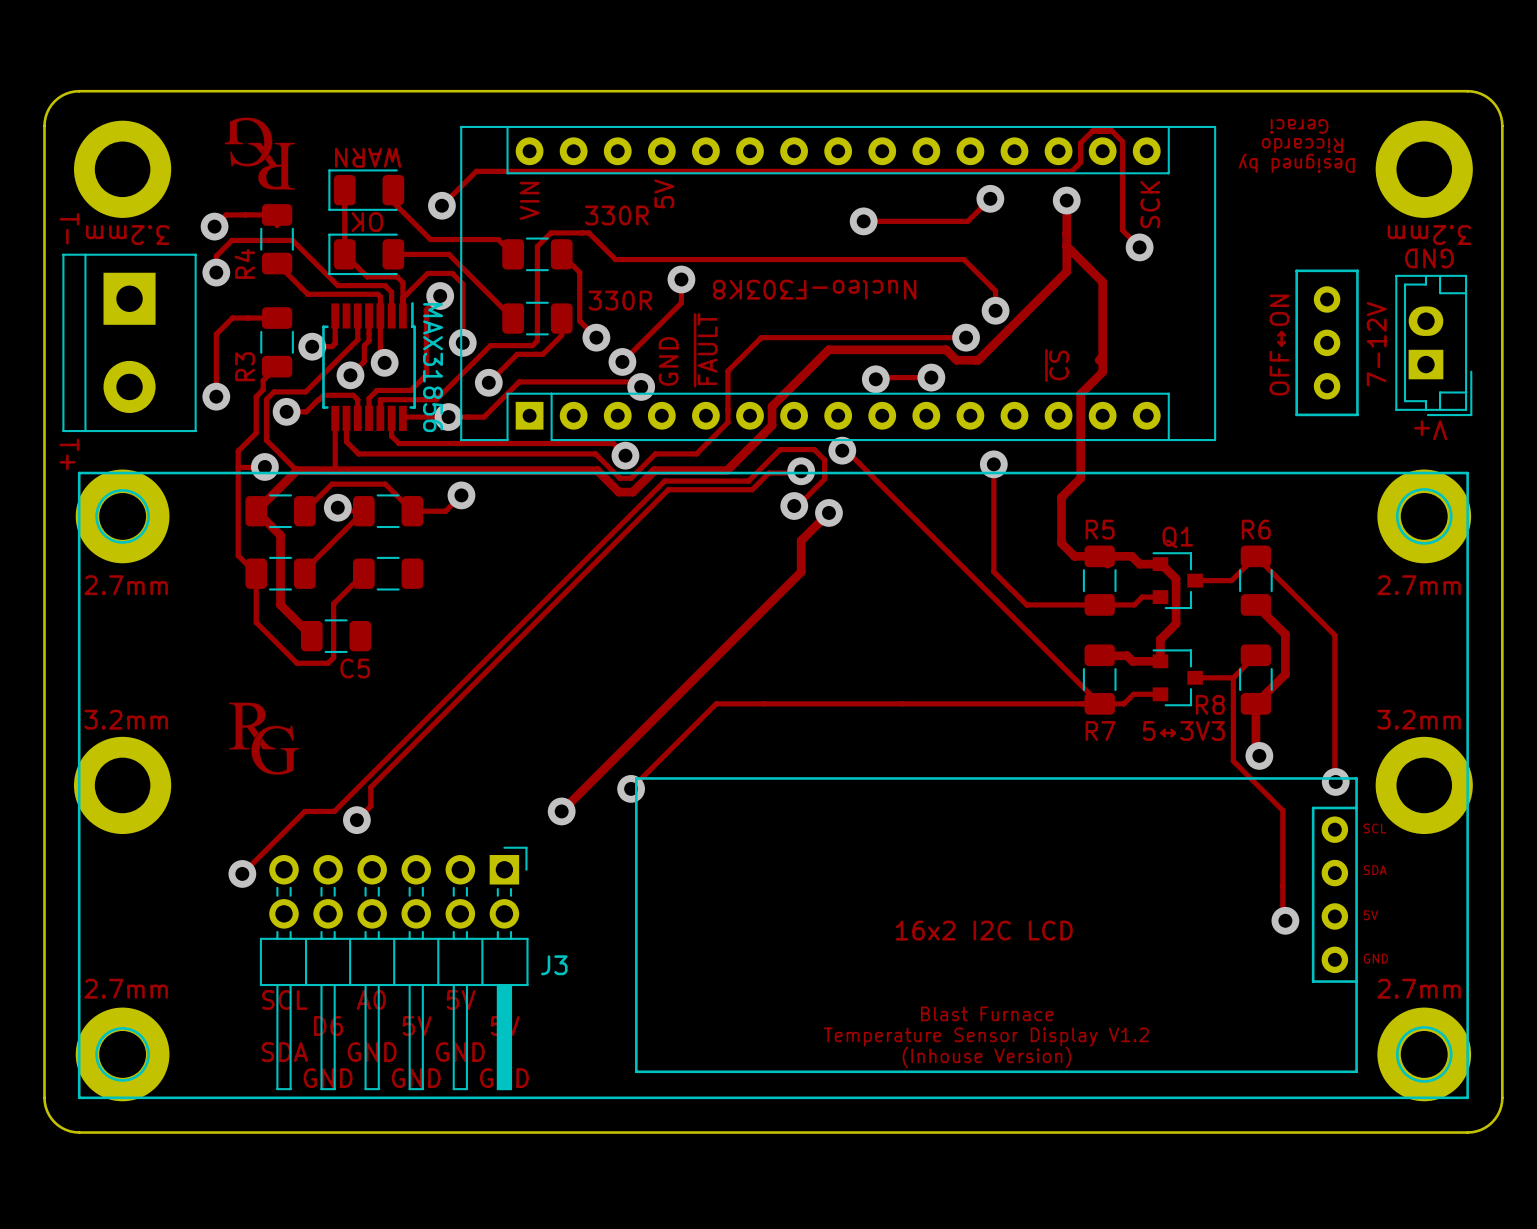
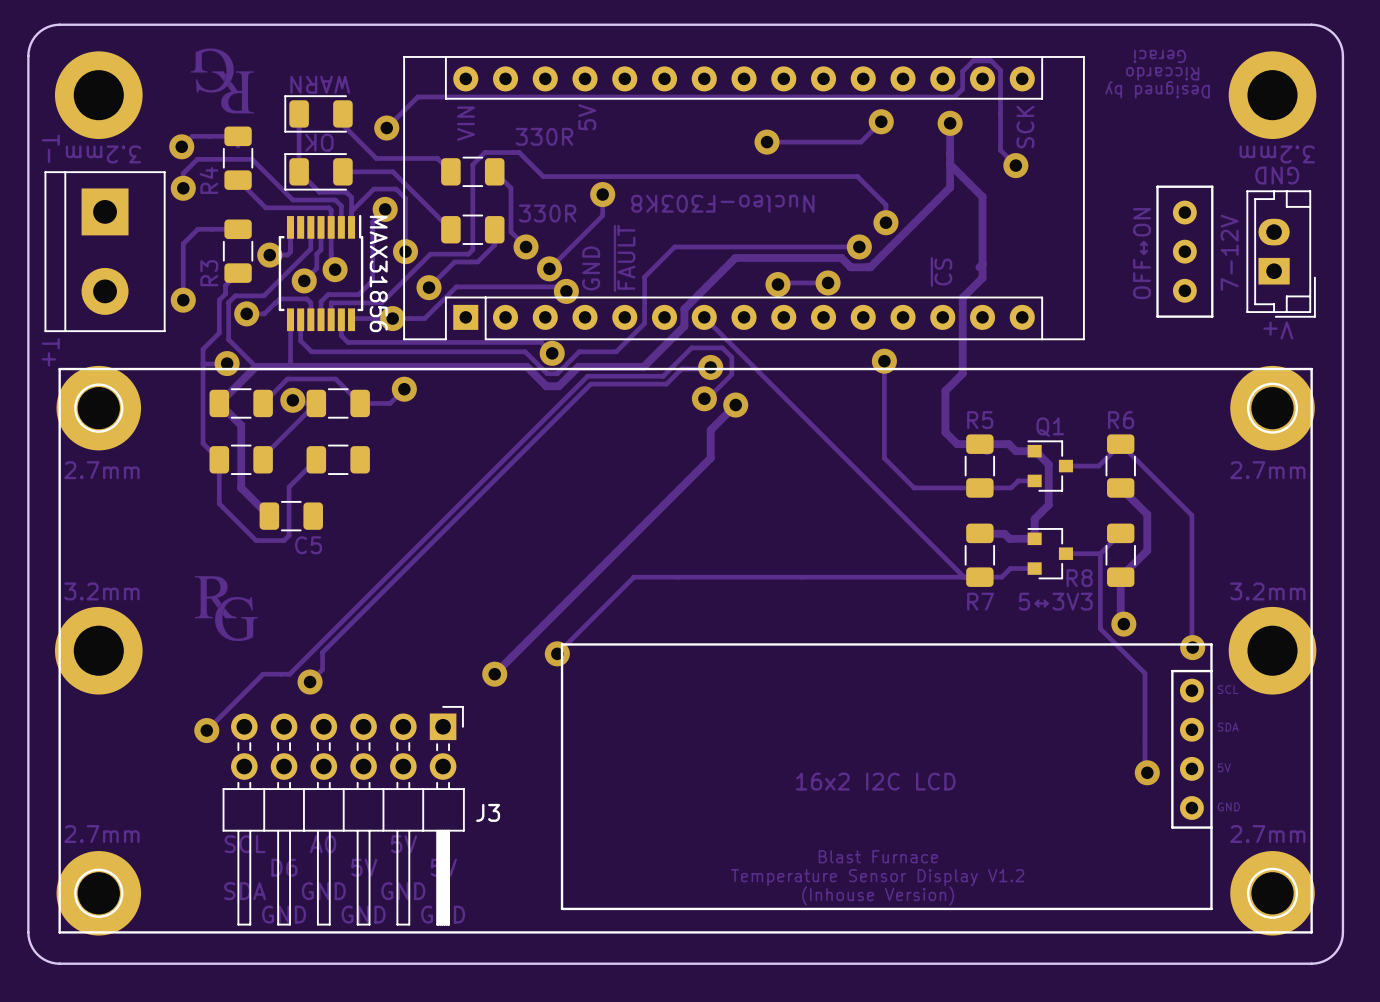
track: none -> (704, 317) (964, 577)
track: (842, 450) (846, 450) (1099, 703) -> none
via: (842, 450) -> none

